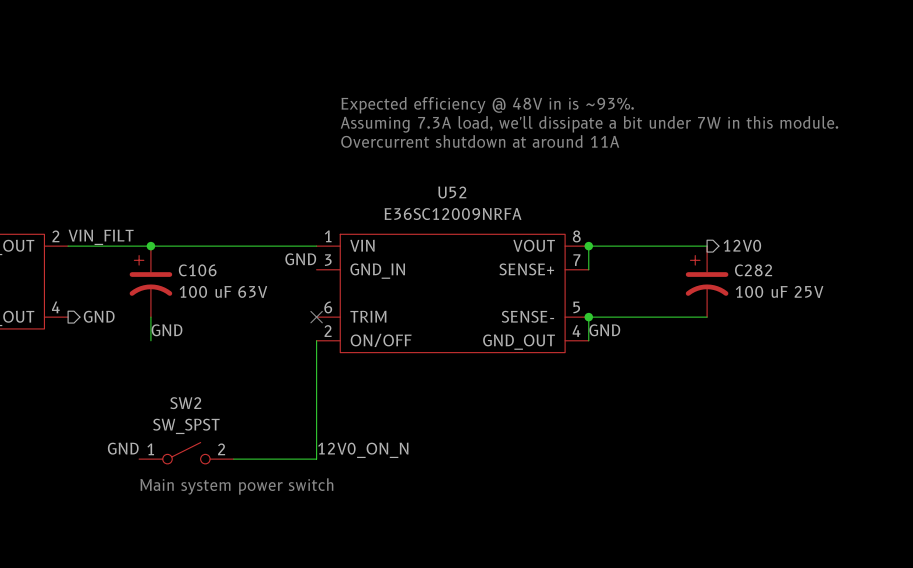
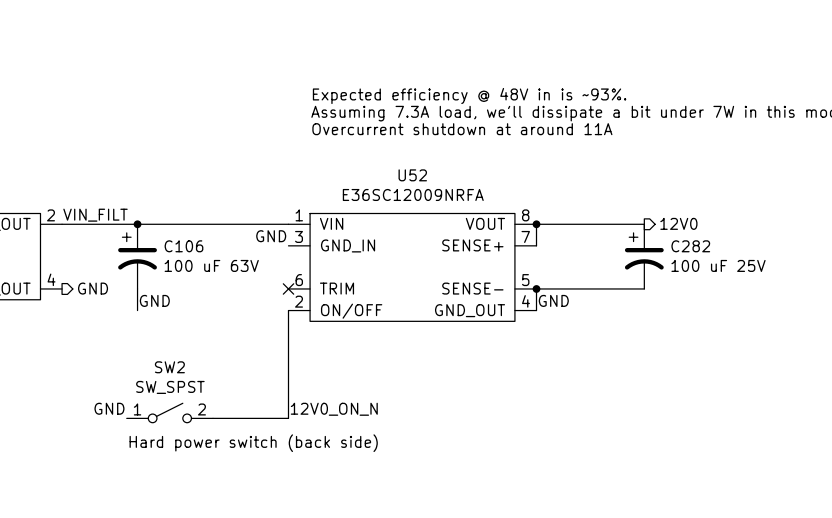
text: Main system power switch (236, 486) -> Hard power switch (back side) (253, 443)

